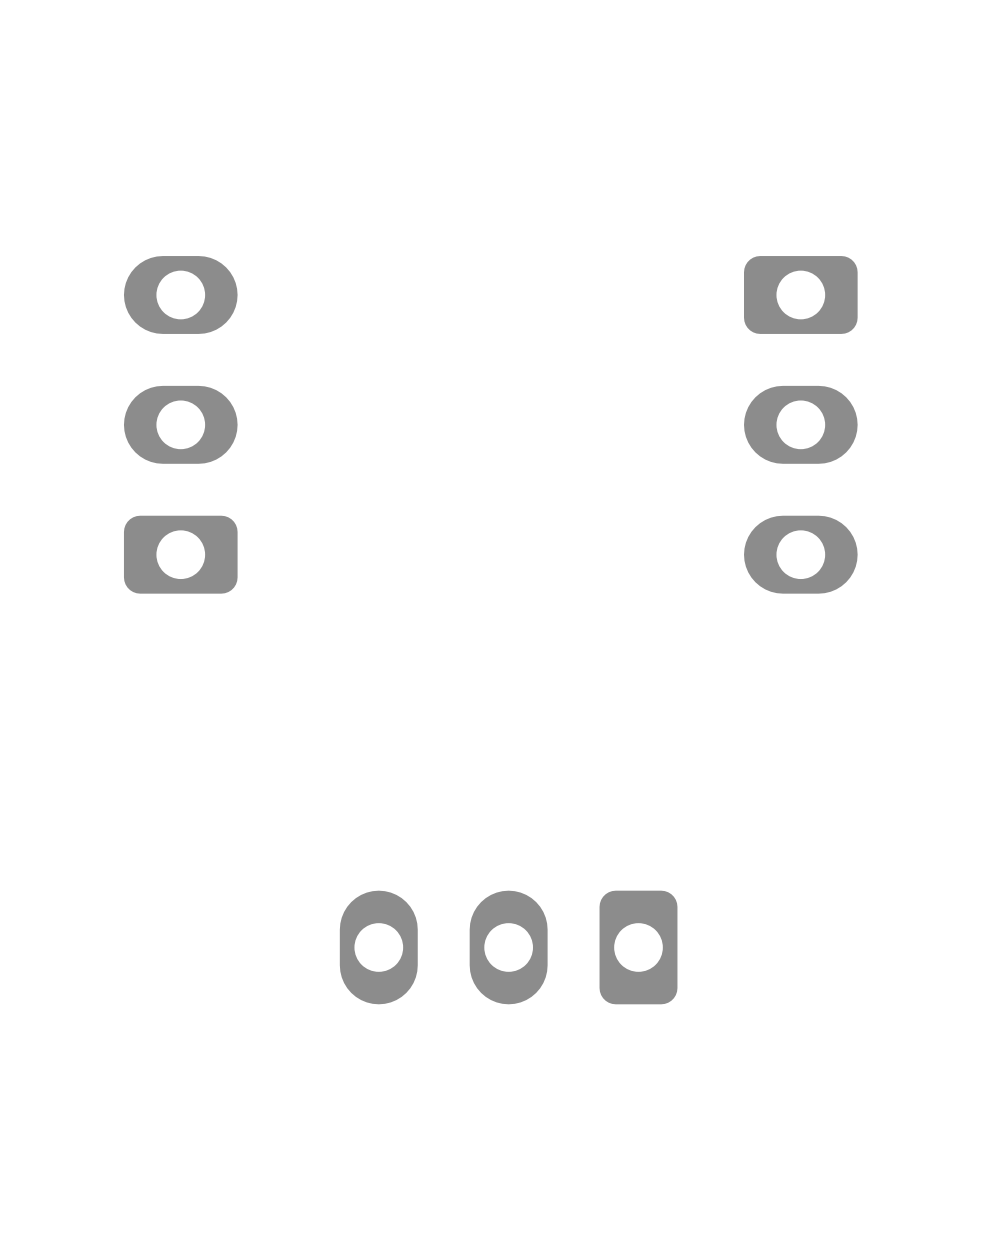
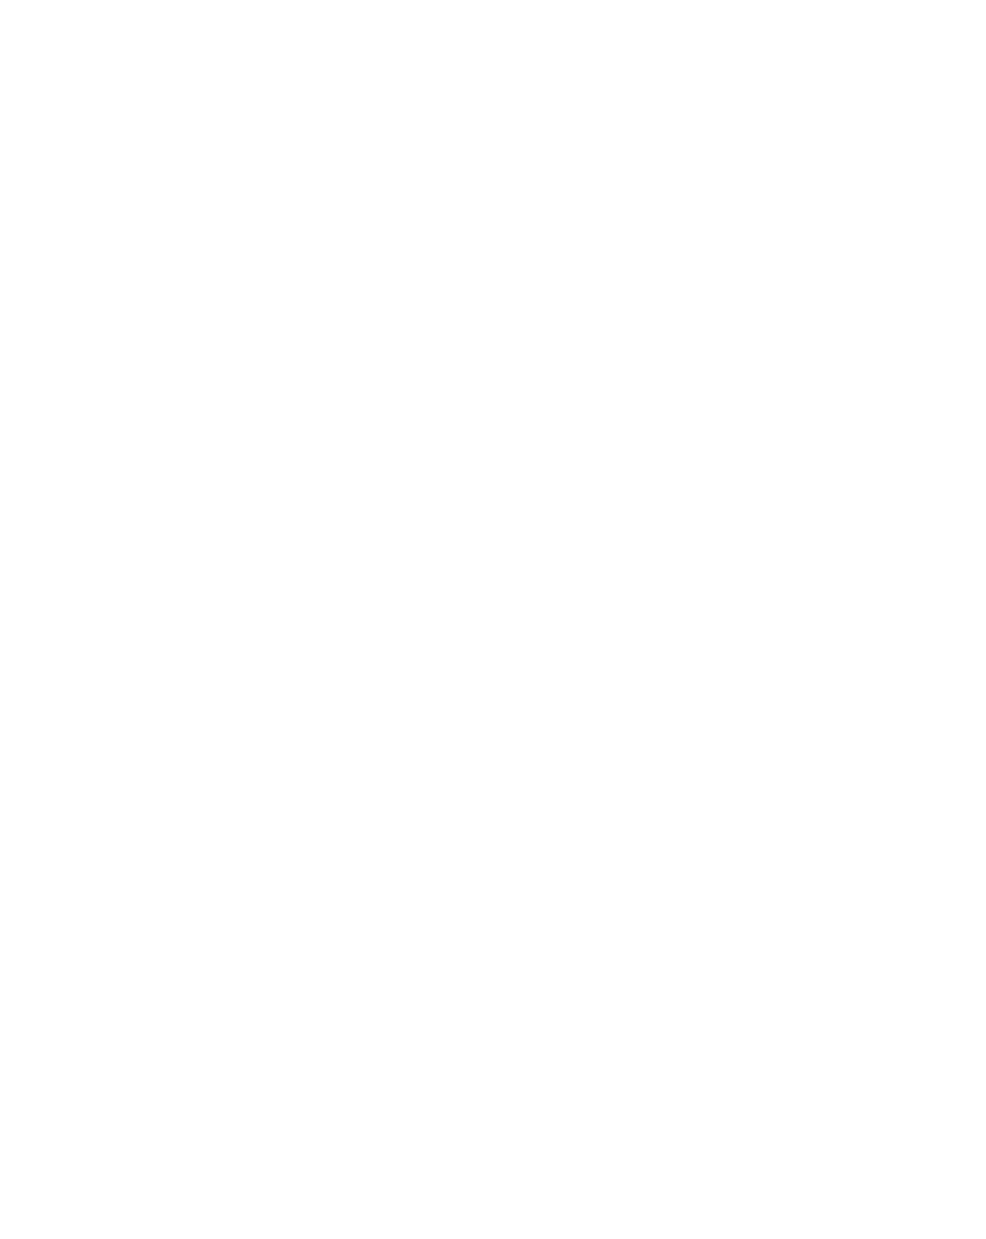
part: (180, 424) -> none
part: (800, 424) -> none
part: (508, 947) -> none

